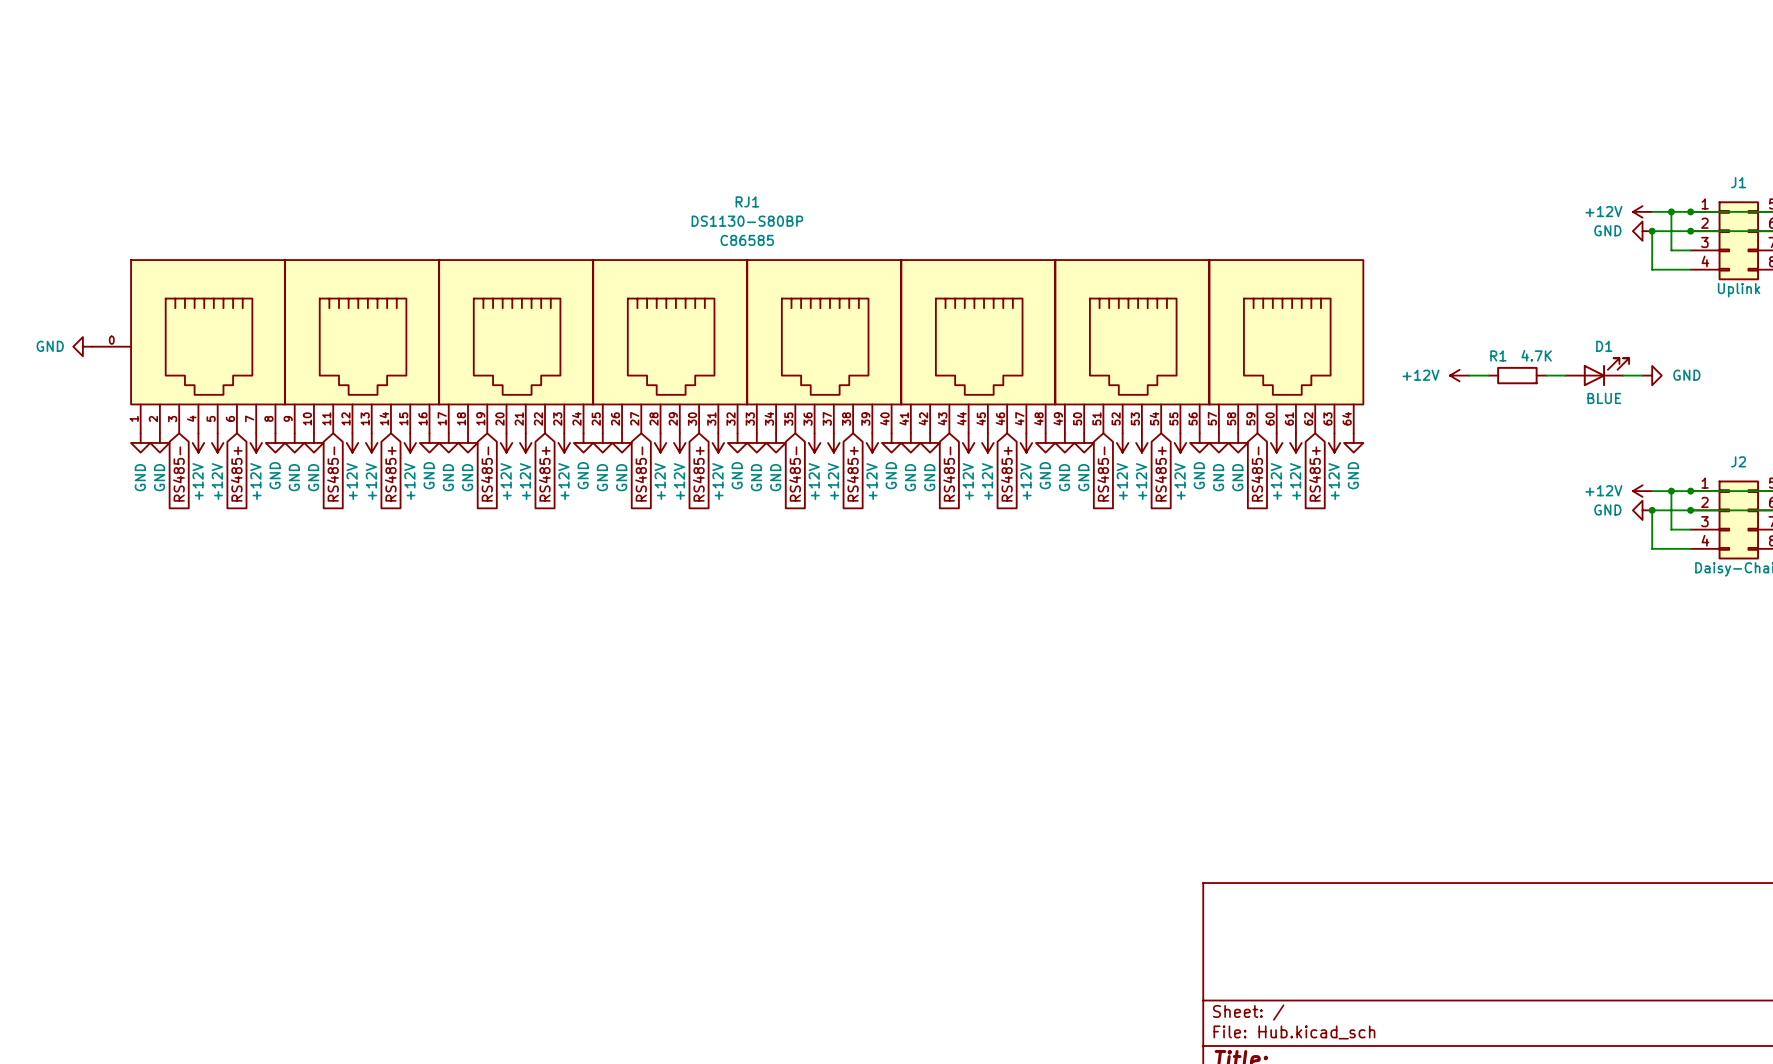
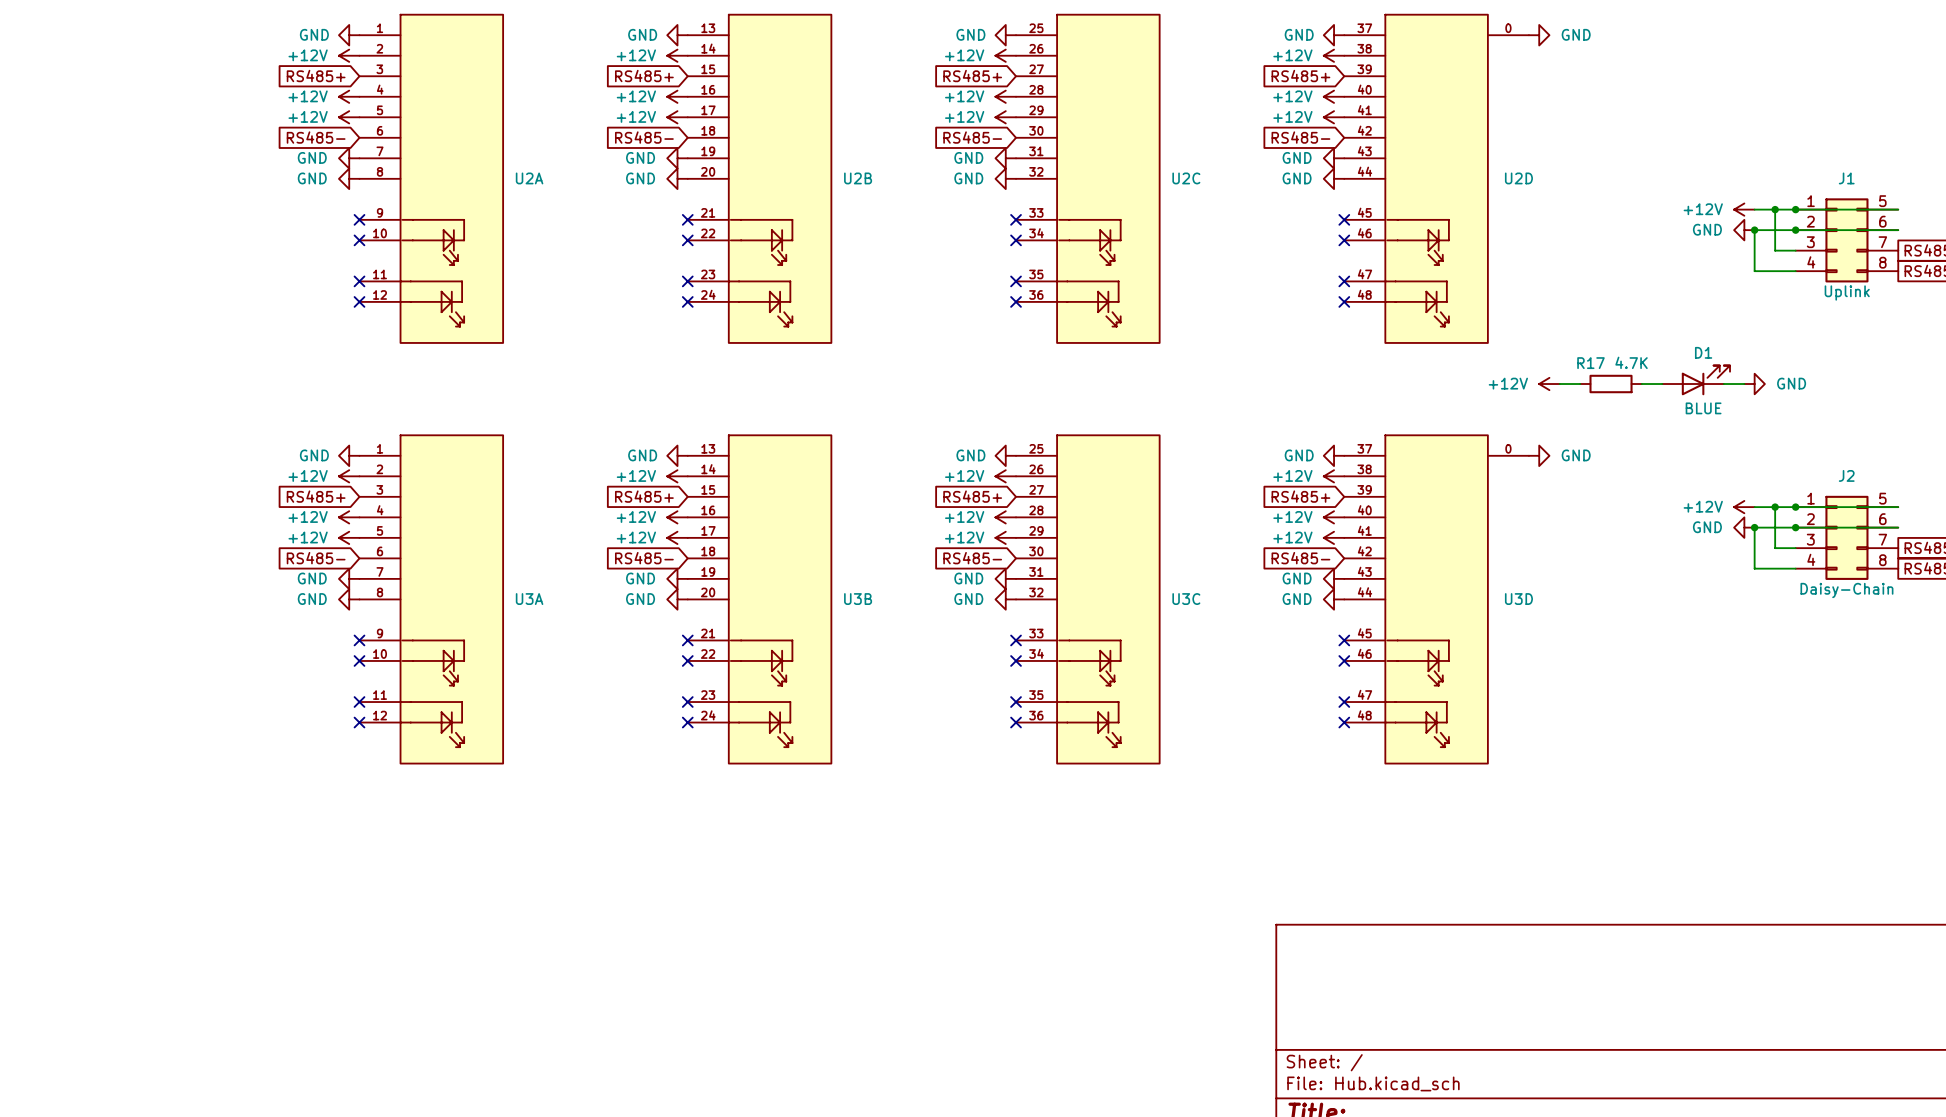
power symbol: none -> GND (349, 35)
power symbol: none -> GND (677, 35)
power symbol: none -> GND (1005, 35)
power symbol: none -> GND (1334, 35)
power symbol: none -> GND (1539, 35)
power symbol: none -> +12V (349, 55)
power symbol: none -> +12V (677, 55)
power symbol: none -> +12V (1005, 55)
power symbol: none -> +12V (1334, 55)
global label: none -> RS485+ (316, 76)
global label: none -> RS485+ (644, 76)
global label: none -> RS485+ (972, 76)
global label: none -> RS485+ (1300, 76)
power symbol: none -> +12V (349, 96)
power symbol: none -> +12V (677, 96)
power symbol: none -> +12V (1005, 96)
power symbol: none -> +12V (1334, 96)
power symbol: none -> +12V (349, 117)
power symbol: none -> +12V (677, 117)
power symbol: none -> +12V (1005, 117)
power symbol: none -> +12V (1334, 117)
global label: none -> RS485- (316, 137)
global label: none -> RS485- (644, 137)
global label: none -> RS485- (972, 137)
global label: none -> RS485- (1300, 137)
power symbol: none -> GND (349, 158)
power symbol: none -> GND (677, 158)
power symbol: none -> GND (1005, 158)
power symbol: none -> GND (1334, 158)
power symbol: none -> GND (349, 178)
U2A: none -> (431, 178)
power symbol: none -> GND (677, 178)
U2B: none -> (759, 178)
power symbol: none -> GND (1005, 178)
U2C: none -> (1087, 178)
power symbol: none -> GND (1334, 178)
U2D: none -> (1436, 178)
no-connect mark: none -> (359, 219)
no-connect mark: none -> (687, 219)
no-connect mark: none -> (1016, 219)
no-connect mark: none -> (1344, 219)
no-connect mark: none -> (359, 240)
no-connect mark: none -> (687, 240)
no-connect mark: none -> (1016, 240)
no-connect mark: none -> (1344, 240)
no-connect mark: none -> (359, 281)
no-connect mark: none -> (687, 281)
no-connect mark: none -> (1016, 281)
no-connect mark: none -> (1344, 281)
no-connect mark: none -> (359, 301)
no-connect mark: none -> (687, 301)
no-connect mark: none -> (1016, 301)
no-connect mark: none -> (1344, 301)
power symbol: GND (82, 346) -> none
RJ1: DS1130-S80BP (727, 346) -> none
R1 name: R1 (1498, 355) -> R17 (1590, 363)
power symbol: GND (140, 442) -> none
power symbol: GND (159, 442) -> none
power symbol: +12V (198, 442) -> none
power symbol: +12V (217, 442) -> none
power symbol: +12V (256, 442) -> none
power symbol: GND (275, 442) -> none
power symbol: GND (294, 442) -> none
power symbol: GND (313, 442) -> none
power symbol: none -> GND (349, 455)
power symbol: +12V (352, 442) -> none
power symbol: +12V (371, 442) -> none
power symbol: +12V (410, 442) -> none
power symbol: GND (429, 442) -> none
power symbol: GND (448, 442) -> none
power symbol: GND (468, 442) -> none
power symbol: +12V (506, 442) -> none
power symbol: +12V (525, 442) -> none
power symbol: +12V (564, 442) -> none
power symbol: GND (583, 442) -> none
power symbol: GND (602, 442) -> none
power symbol: GND (622, 442) -> none
power symbol: none -> GND (677, 455)
power symbol: +12V (660, 442) -> none
power symbol: +12V (679, 442) -> none
power symbol: +12V (718, 442) -> none
power symbol: GND (737, 442) -> none
power symbol: GND (756, 442) -> none
power symbol: GND (776, 442) -> none
power symbol: +12V (814, 442) -> none
power symbol: +12V (833, 442) -> none
power symbol: +12V (872, 442) -> none
power symbol: GND (891, 442) -> none
power symbol: GND (910, 442) -> none
power symbol: GND (930, 442) -> none
power symbol: none -> GND (1005, 455)
power symbol: +12V (968, 442) -> none
power symbol: +12V (987, 442) -> none
power symbol: +12V (1026, 442) -> none
power symbol: GND (1045, 442) -> none
power symbol: GND (1064, 442) -> none
power symbol: GND (1084, 442) -> none
power symbol: +12V (1122, 442) -> none
power symbol: +12V (1141, 442) -> none
power symbol: +12V (1180, 442) -> none
power symbol: GND (1199, 442) -> none
power symbol: GND (1218, 442) -> none
power symbol: GND (1238, 442) -> none
power symbol: none -> GND (1334, 455)
power symbol: +12V (1276, 442) -> none
power symbol: +12V (1295, 442) -> none
power symbol: +12V (1334, 442) -> none
power symbol: GND (1353, 442) -> none
power symbol: none -> GND (1539, 455)
power symbol: none -> +12V (349, 476)
power symbol: none -> +12V (677, 476)
power symbol: none -> +12V (1005, 476)
power symbol: none -> +12V (1334, 476)
global label: RS485- (178, 474) -> none
global label: RS485+ (236, 474) -> none
global label: RS485- (332, 474) -> RS485+ (316, 496)
global label: RS485+ (390, 474) -> none
global label: RS485- (487, 474) -> none
global label: RS485+ (544, 474) -> none
global label: RS485- (641, 474) -> RS485+ (644, 496)
global label: RS485+ (698, 474) -> none
global label: RS485- (795, 474) -> none
global label: RS485+ (852, 474) -> none
global label: RS485- (949, 474) -> RS485+ (972, 496)
global label: RS485+ (1006, 474) -> none
global label: RS485- (1103, 474) -> none
global label: RS485+ (1160, 474) -> none
global label: RS485- (1257, 474) -> RS485+ (1300, 496)
global label: RS485+ (1314, 474) -> none
power symbol: none -> +12V (349, 517)
power symbol: none -> +12V (677, 517)
power symbol: none -> +12V (1005, 517)
power symbol: none -> +12V (1334, 517)
power symbol: none -> +12V (349, 537)
power symbol: none -> +12V (677, 537)
power symbol: none -> +12V (1005, 537)
power symbol: none -> +12V (1334, 537)
global label: none -> RS485- (316, 558)
global label: none -> RS485- (644, 558)
global label: none -> RS485- (972, 558)
global label: none -> RS485- (1300, 558)
power symbol: none -> GND (349, 578)
power symbol: none -> GND (677, 578)
power symbol: none -> GND (1005, 578)
power symbol: none -> GND (1334, 578)
power symbol: none -> GND (349, 599)
U3A: none -> (431, 599)
power symbol: none -> GND (677, 599)
U3B: none -> (759, 599)
power symbol: none -> GND (1005, 599)
U3C: none -> (1087, 599)
power symbol: none -> GND (1334, 599)
U3D: none -> (1436, 599)
no-connect mark: none -> (359, 640)
no-connect mark: none -> (687, 640)
no-connect mark: none -> (1016, 640)
no-connect mark: none -> (1344, 640)
no-connect mark: none -> (359, 660)
no-connect mark: none -> (687, 660)
no-connect mark: none -> (1016, 660)
no-connect mark: none -> (1344, 660)
no-connect mark: none -> (359, 702)
no-connect mark: none -> (687, 702)
no-connect mark: none -> (1016, 702)
no-connect mark: none -> (1344, 702)
no-connect mark: none -> (359, 722)
no-connect mark: none -> (687, 722)
no-connect mark: none -> (1016, 722)
no-connect mark: none -> (1344, 722)

